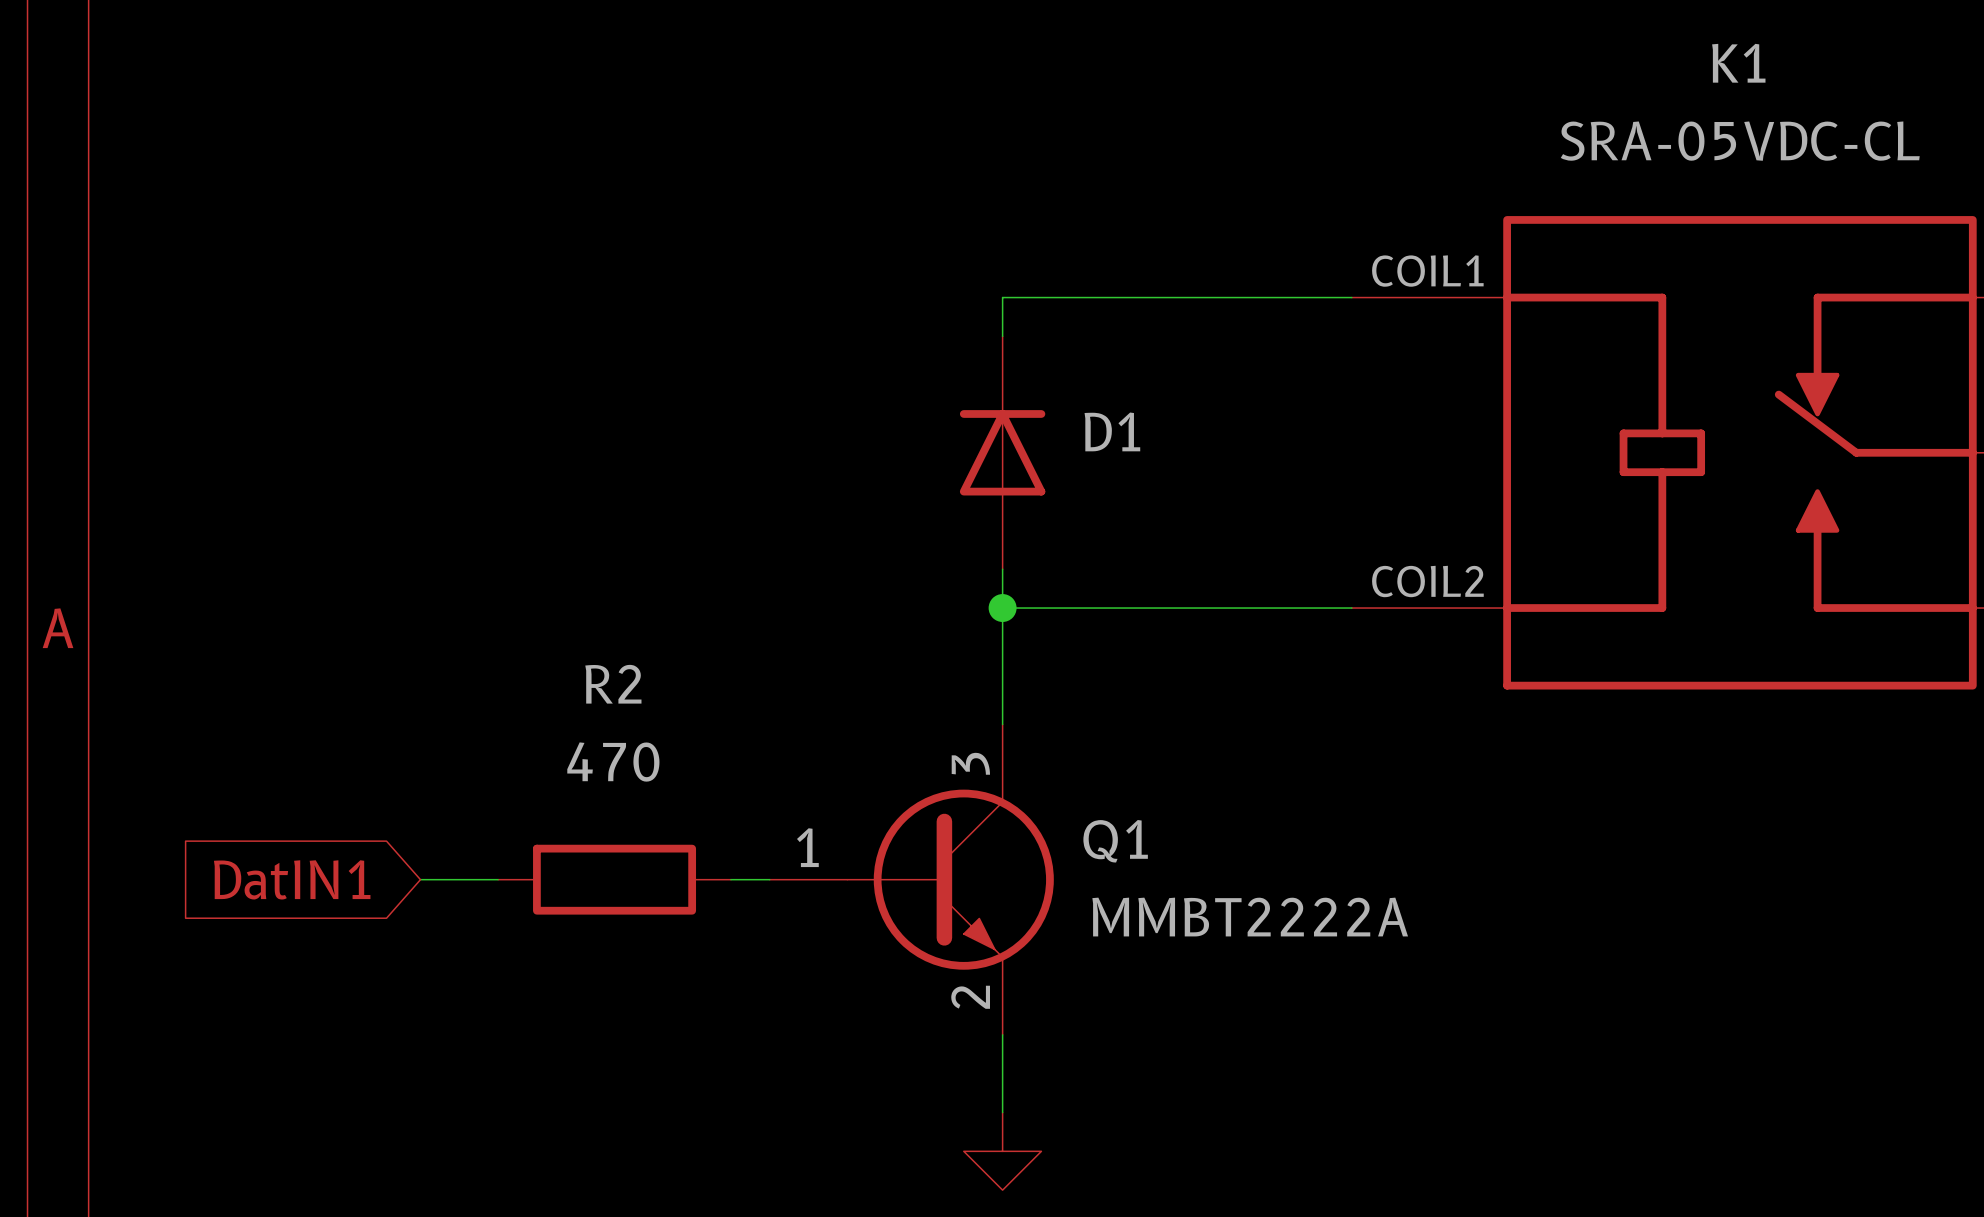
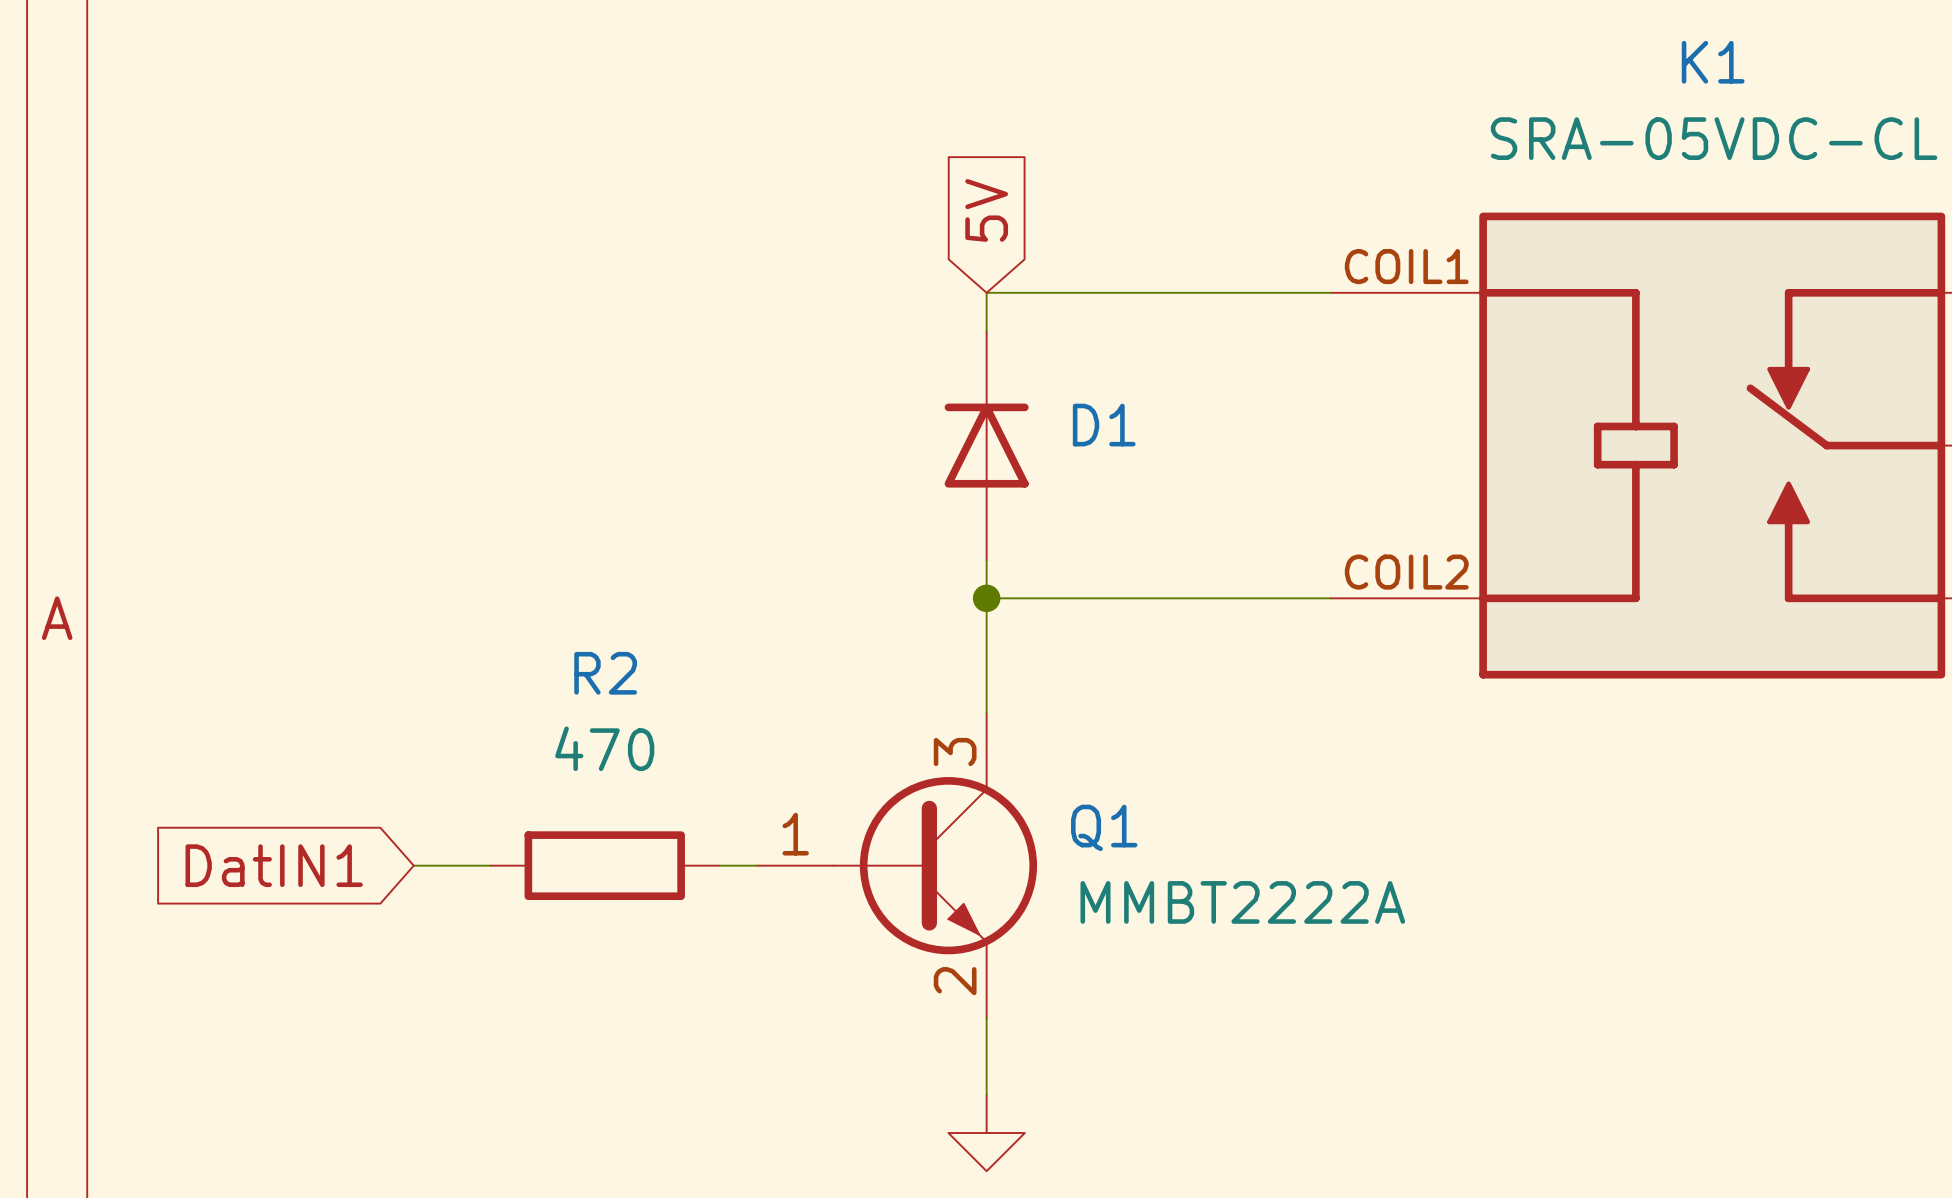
global label: none -> 5V (986, 210)

